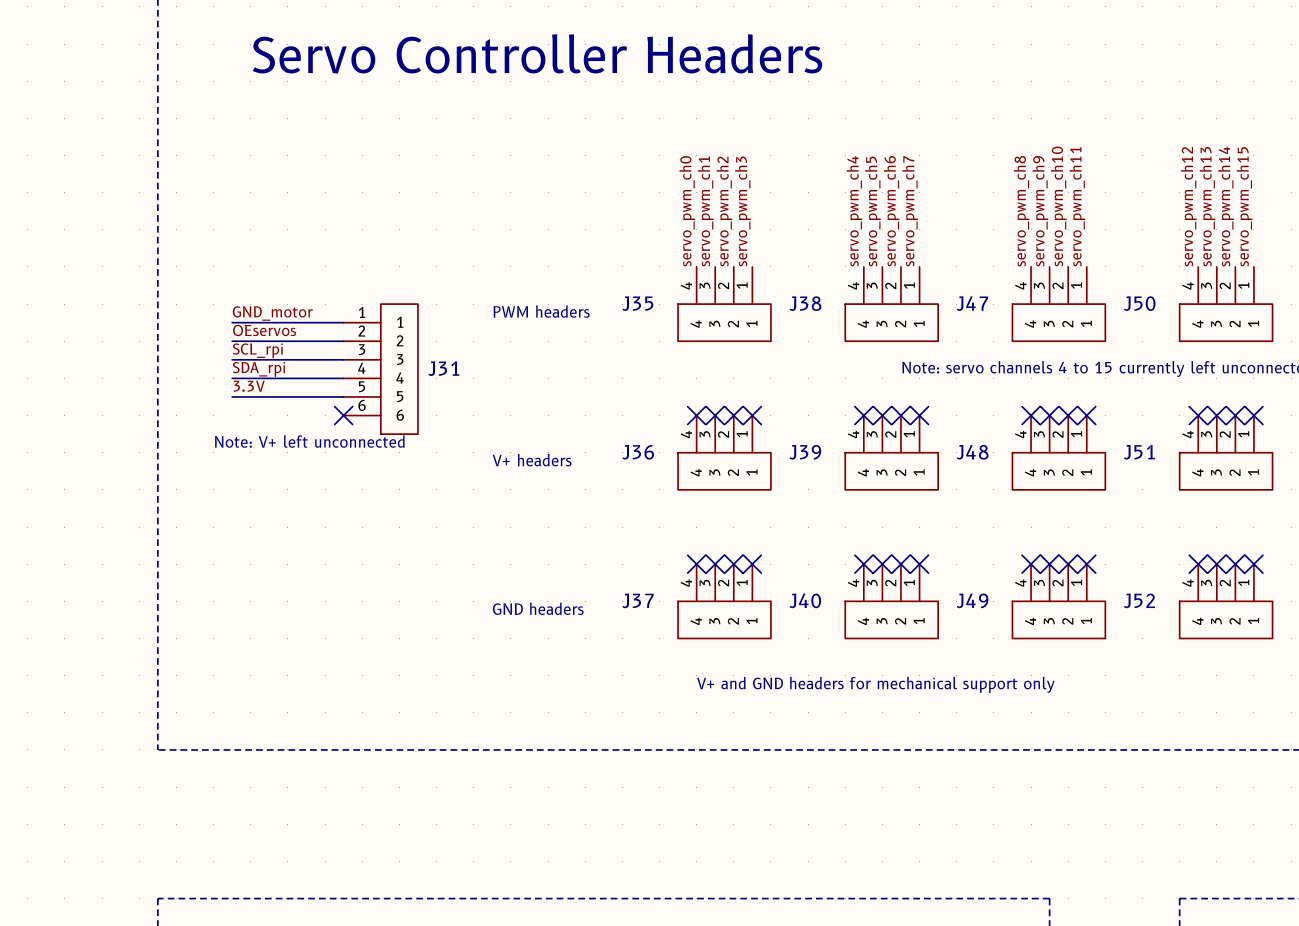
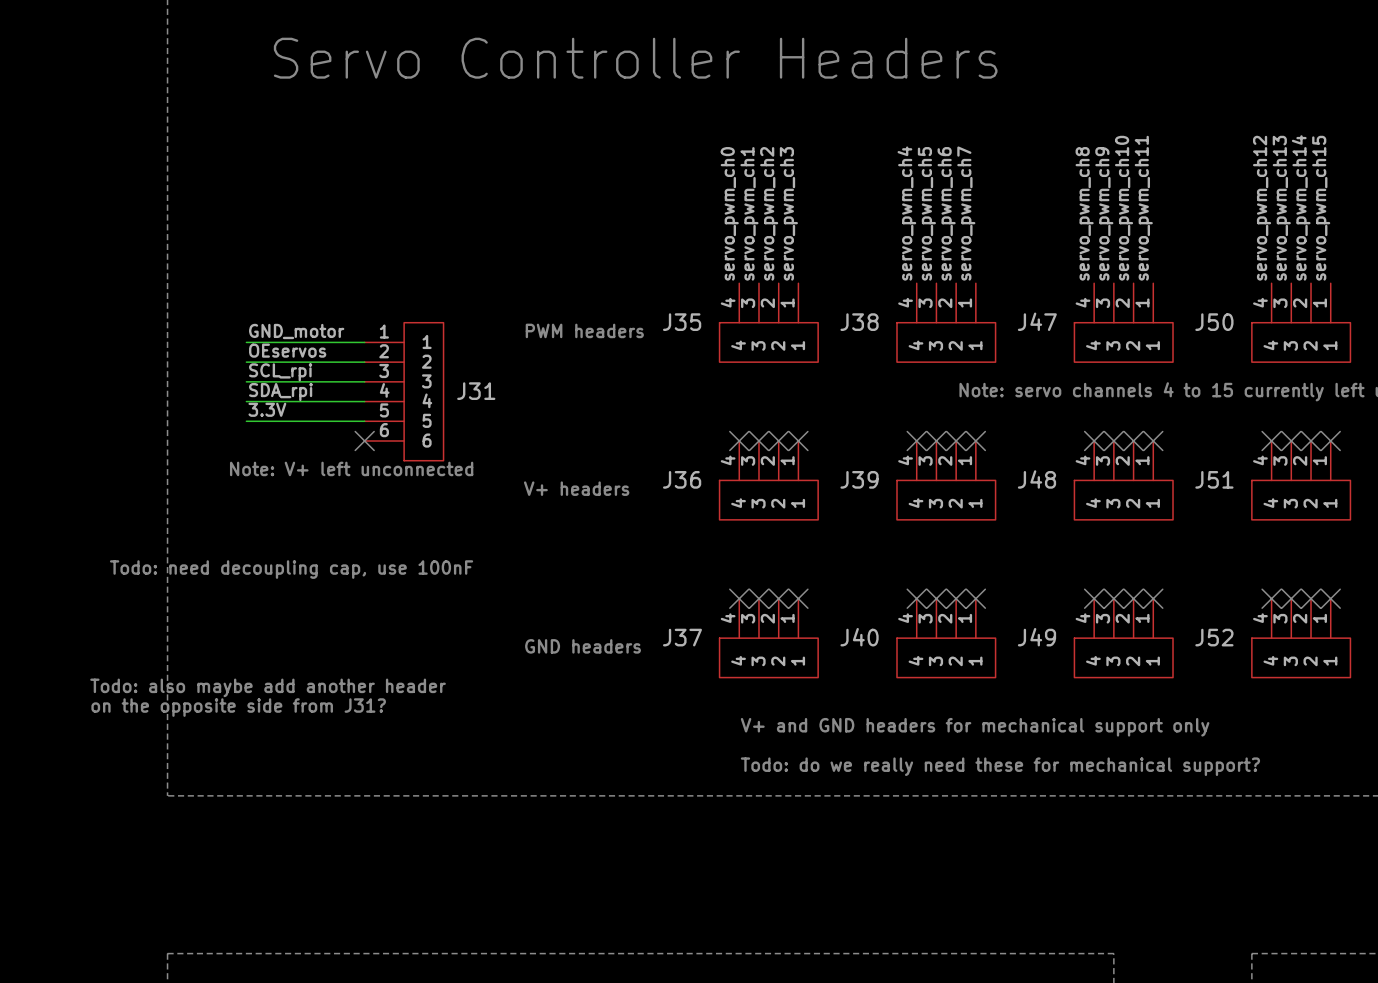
text: none -> Todo: need decoupling cap, use 100nF (291, 569)
text: none -> Todo: also maybe add another header (268, 687)
text: none -> on the opposite side from J31? (238, 707)
text: none -> Todo: do we really need these for mechanical support? (1000, 766)

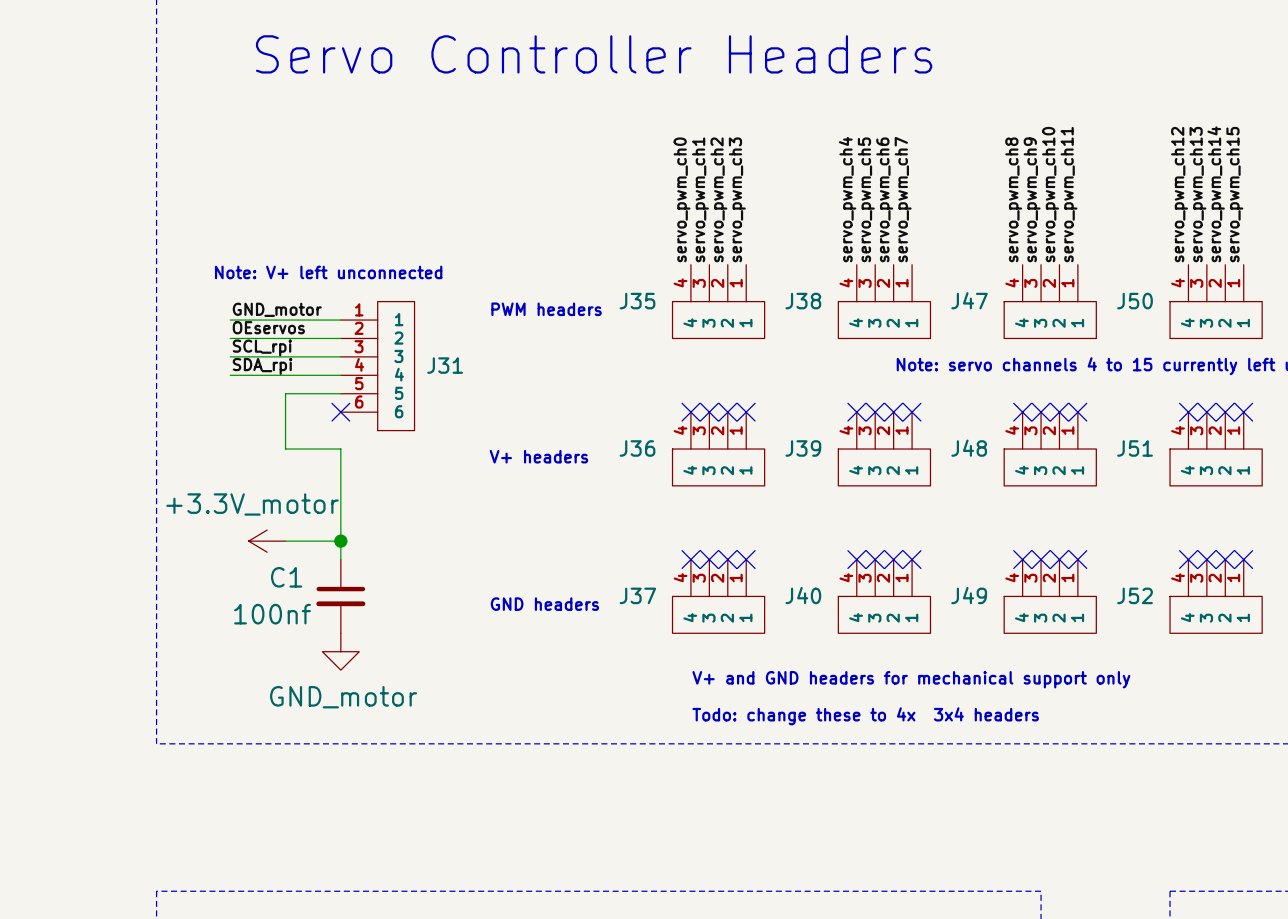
label: 3.3V (267, 409) -> none
wire: (246, 421) (305, 421) -> (340, 559) (340, 449) (285, 449) (285, 393)
text position: Note: V+ left unconnected (351, 468) -> Note: V+ left unconnected (328, 272)
text: Todo: need decoupling cap, use 100nF (291, 569) -> none
power symbol: none -> +3.3V_motor (267, 541)
wire: none -> (285, 541) (340, 541)
junction: none -> (340, 541)
C1: none -> 100nf (340, 596)
text: Todo: also maybe add another header (268, 687) -> none
power symbol: none -> GND_motor (340, 651)
text: on the opposite side from J31? (238, 707) -> none
text: Todo: do we really need these for mechanical support? (1000, 766) -> Todo: change these to 4x 3x4 headers (865, 716)

